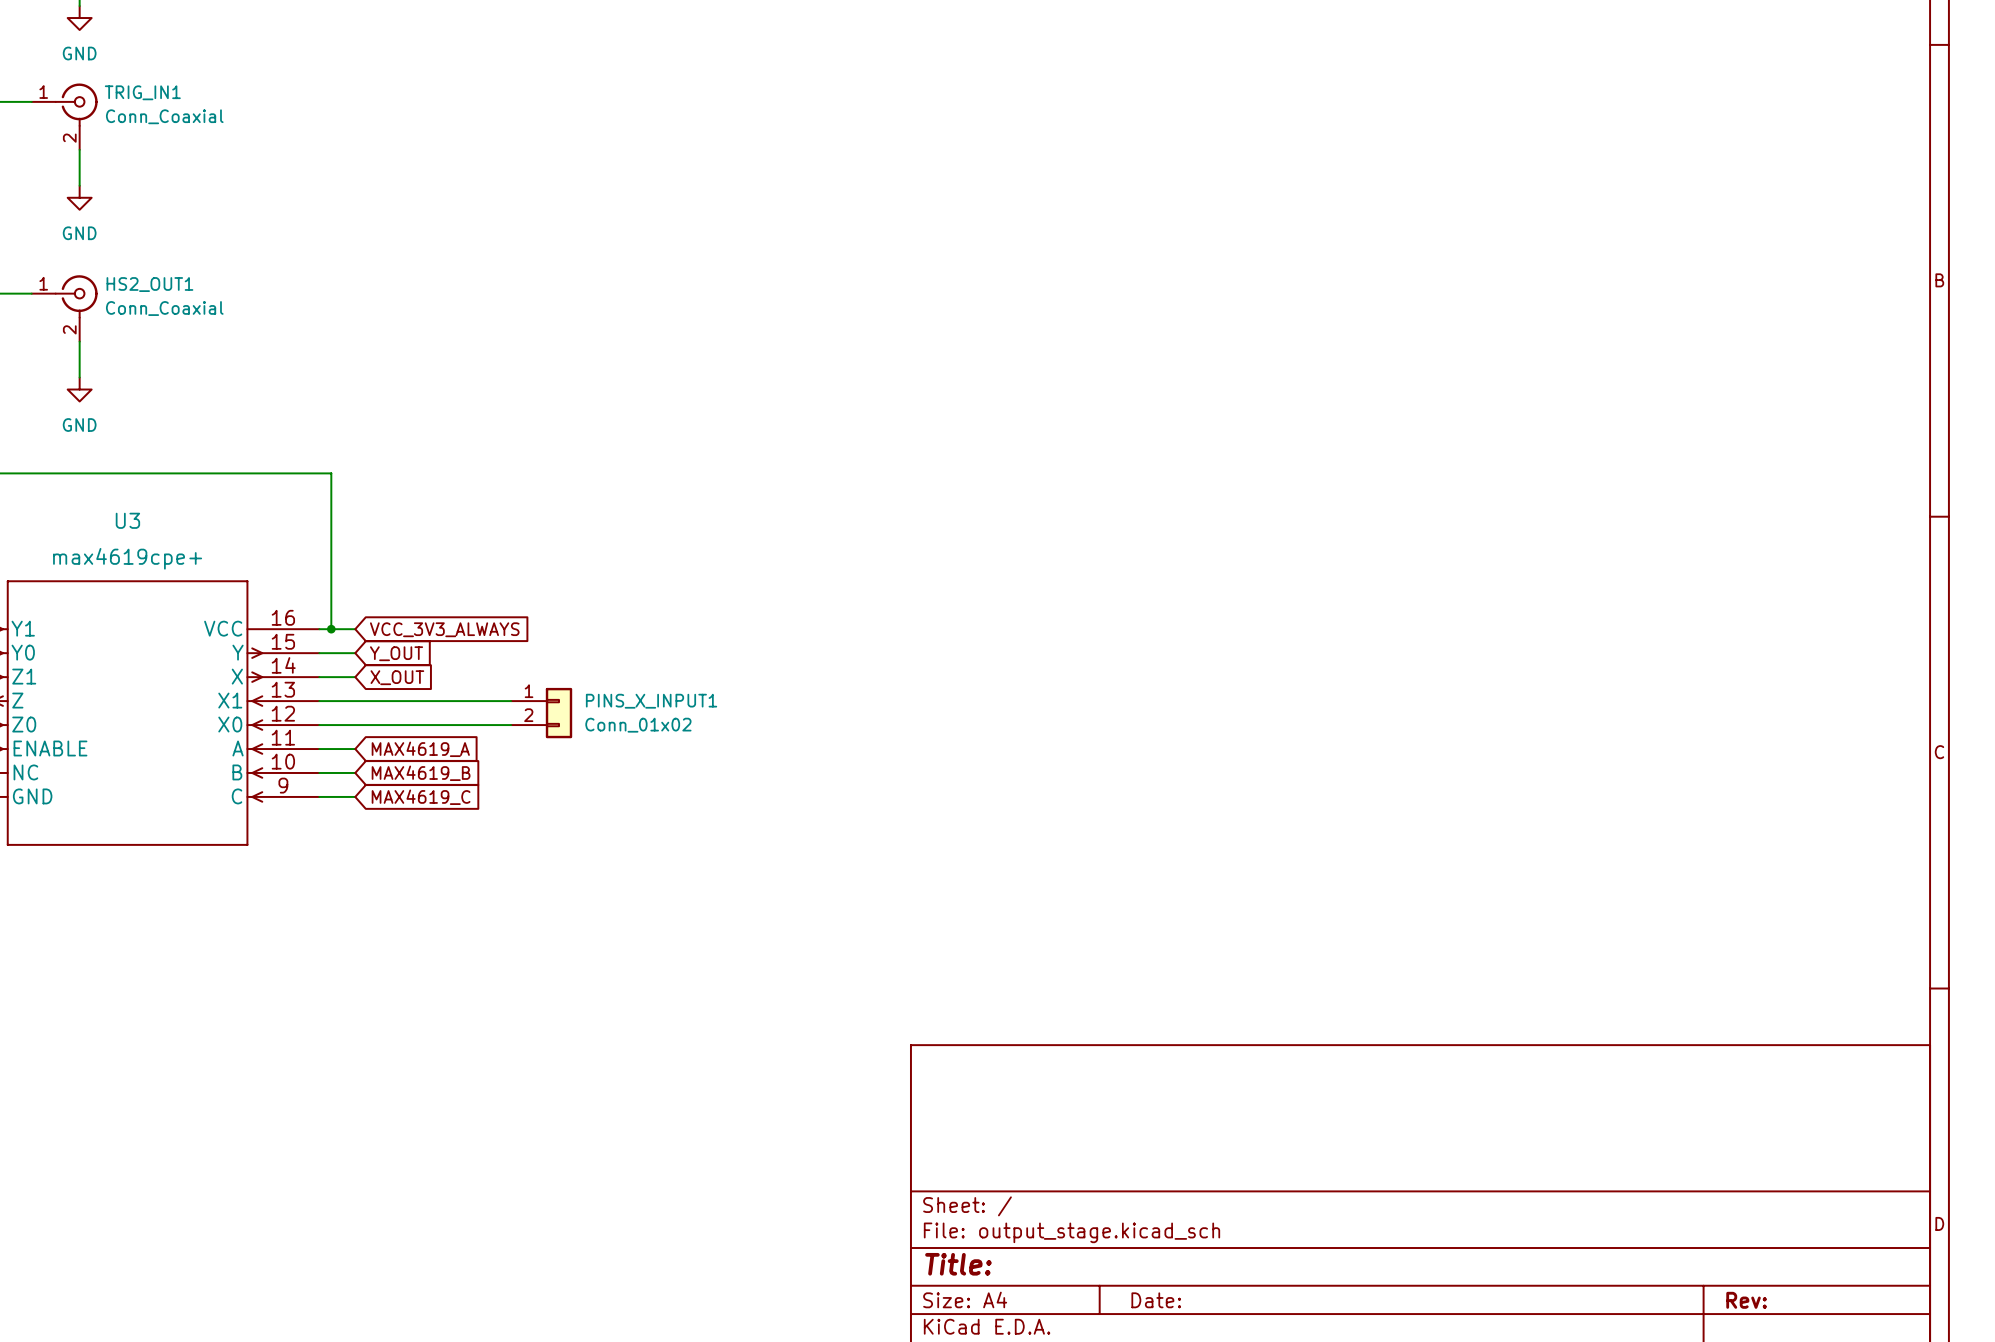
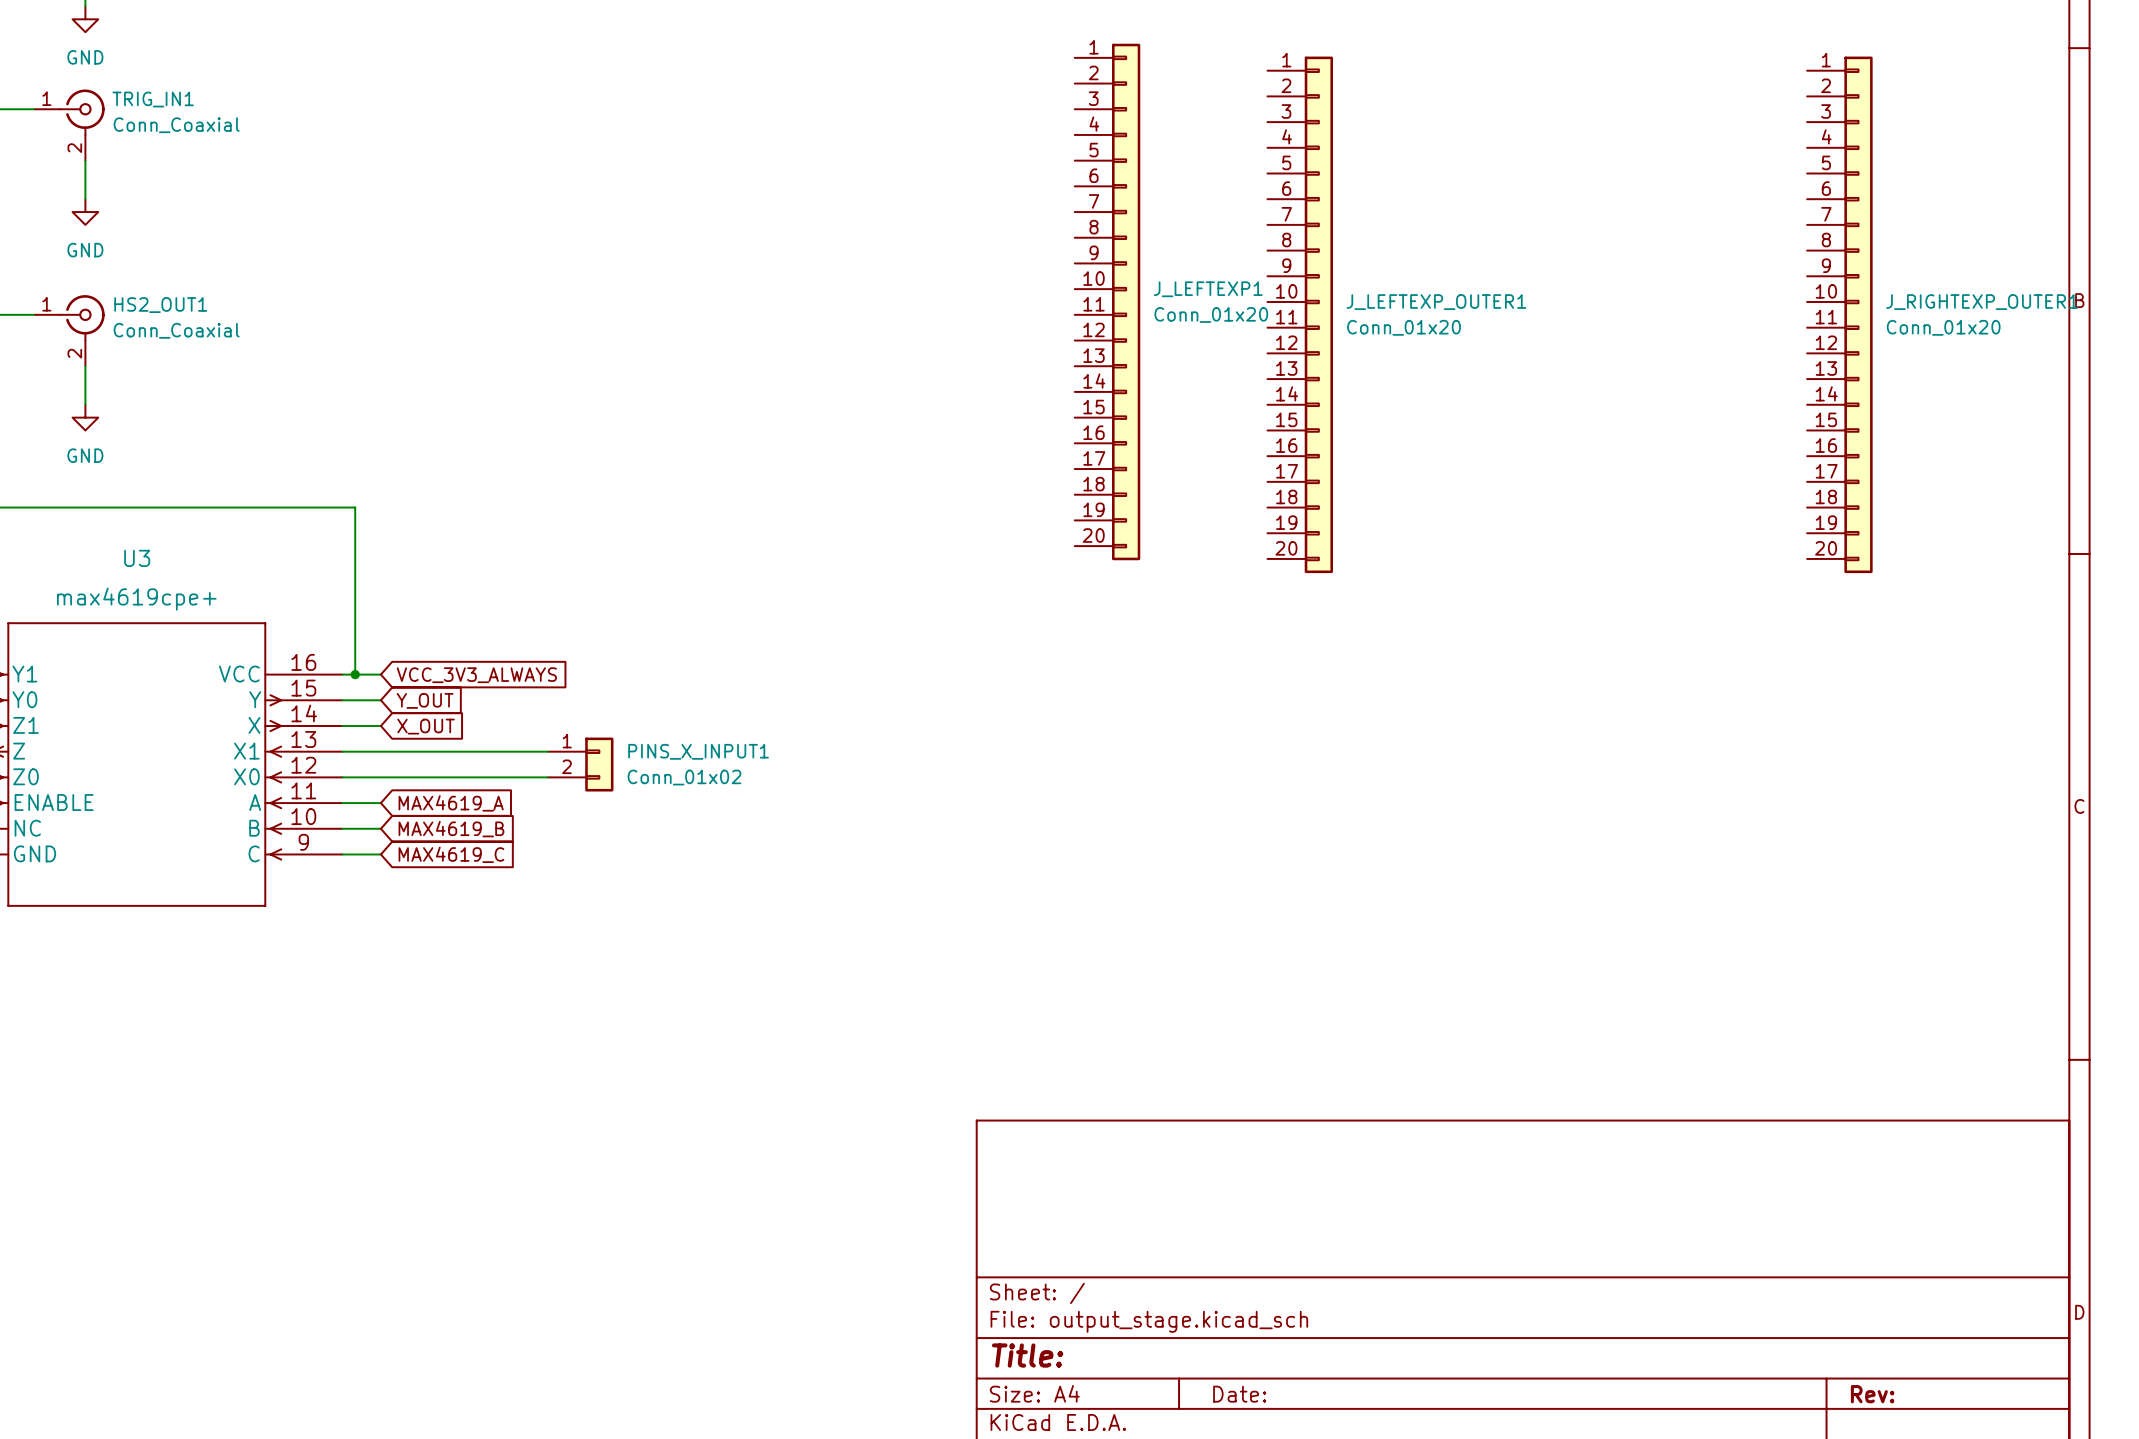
J_LEFTEXP1: none -> Conn_01x20 (1107, 301)
J_LEFTEXP_OUTER1: none -> Conn_01x20 (1300, 314)
J_RIGHTEXP_OUTER1: none -> Conn_01x20 (1839, 314)

